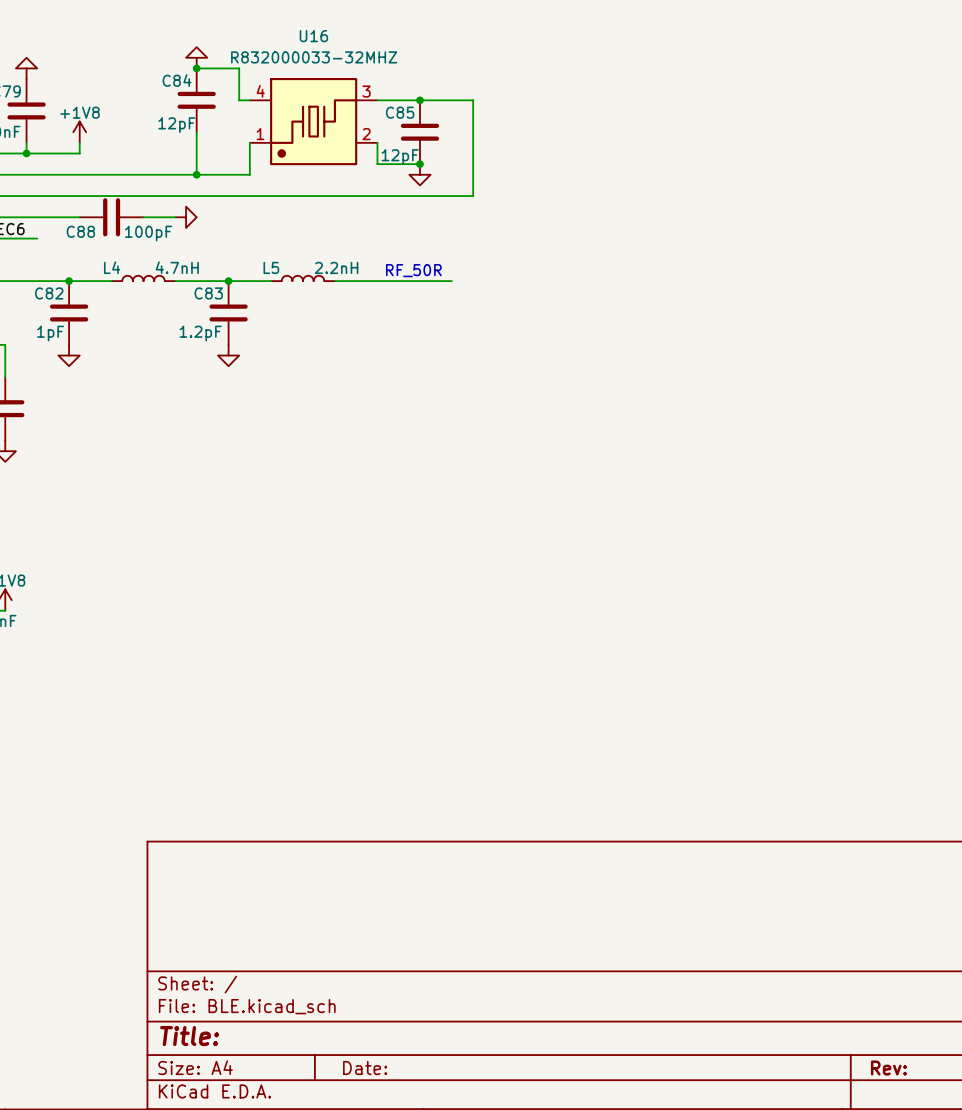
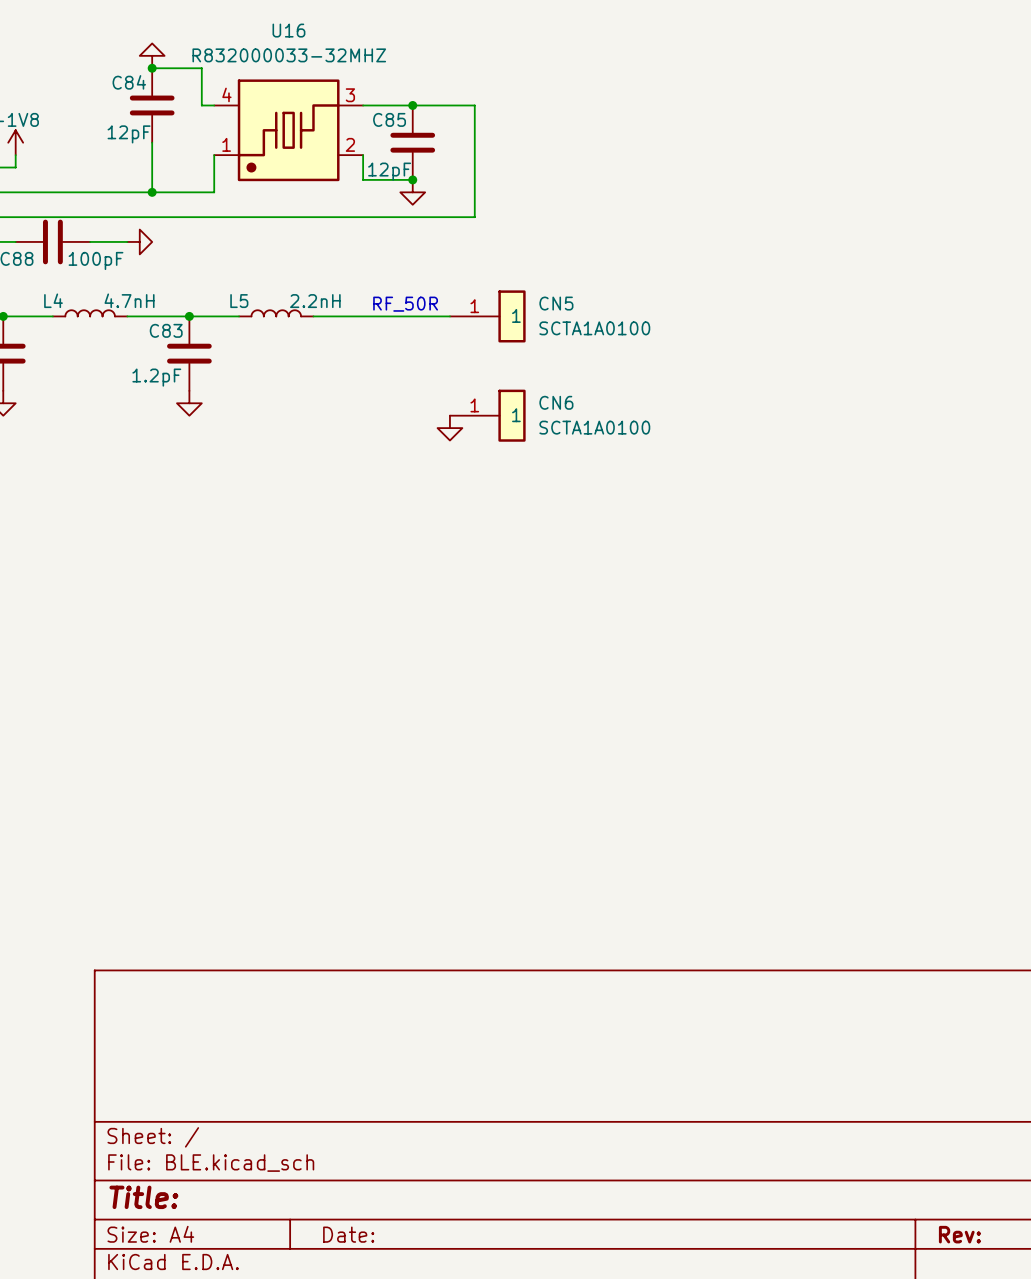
CN5: none -> SCTA1A0100 (487, 316)
CN6: none -> SCTA1A0100 (487, 415)
power symbol: none -> (449, 428)

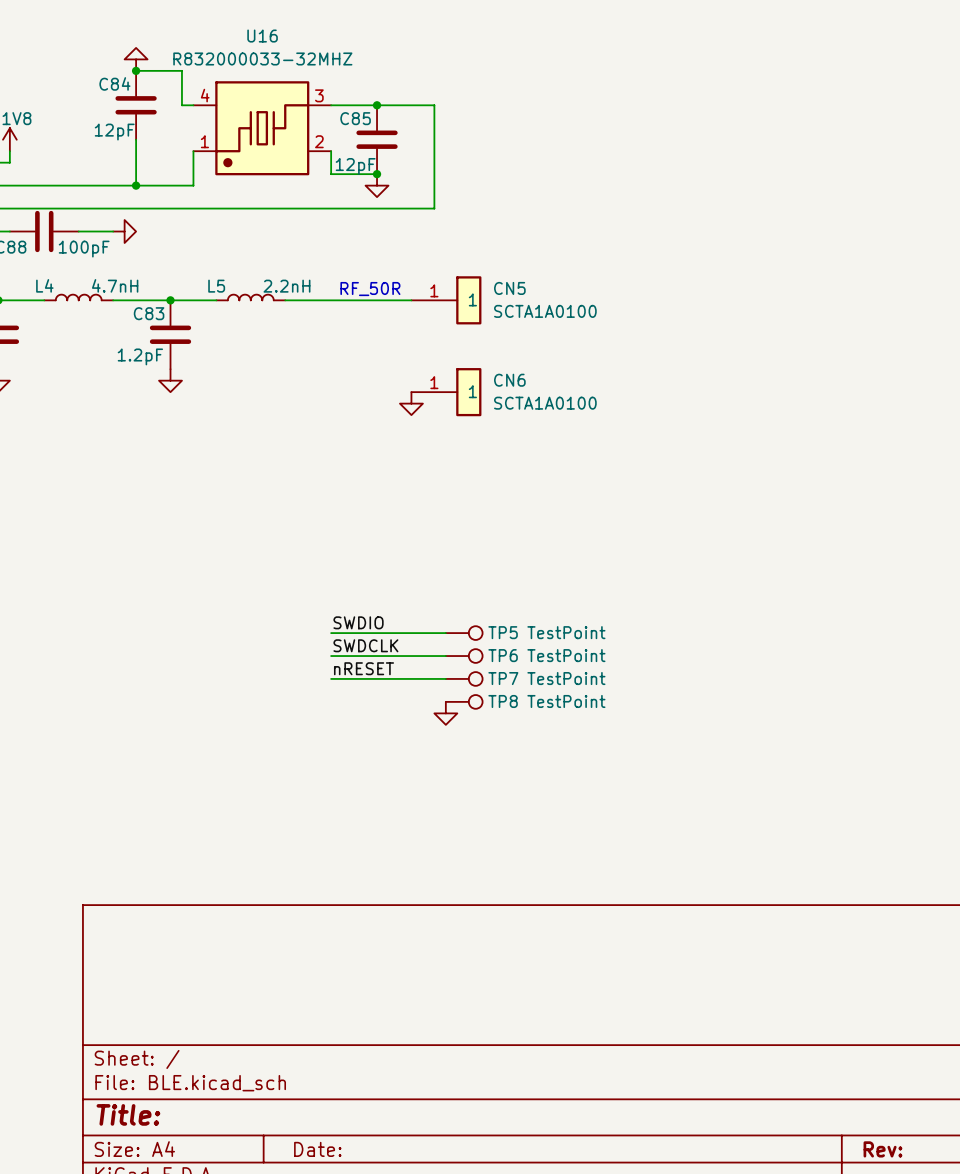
label: none -> SWDIO (358, 622)
wire: none -> (331, 633) (445, 633)
TP5: none -> TestPoint (464, 633)
label: none -> SWDCLK (365, 645)
wire: none -> (331, 656) (445, 656)
TP6: none -> TestPoint (464, 656)
label: none -> nRESET (364, 668)
wire: none -> (331, 678) (445, 678)
TP7: none -> TestPoint (464, 678)
TP8: none -> TestPoint (464, 701)
power symbol: none -> (445, 713)

